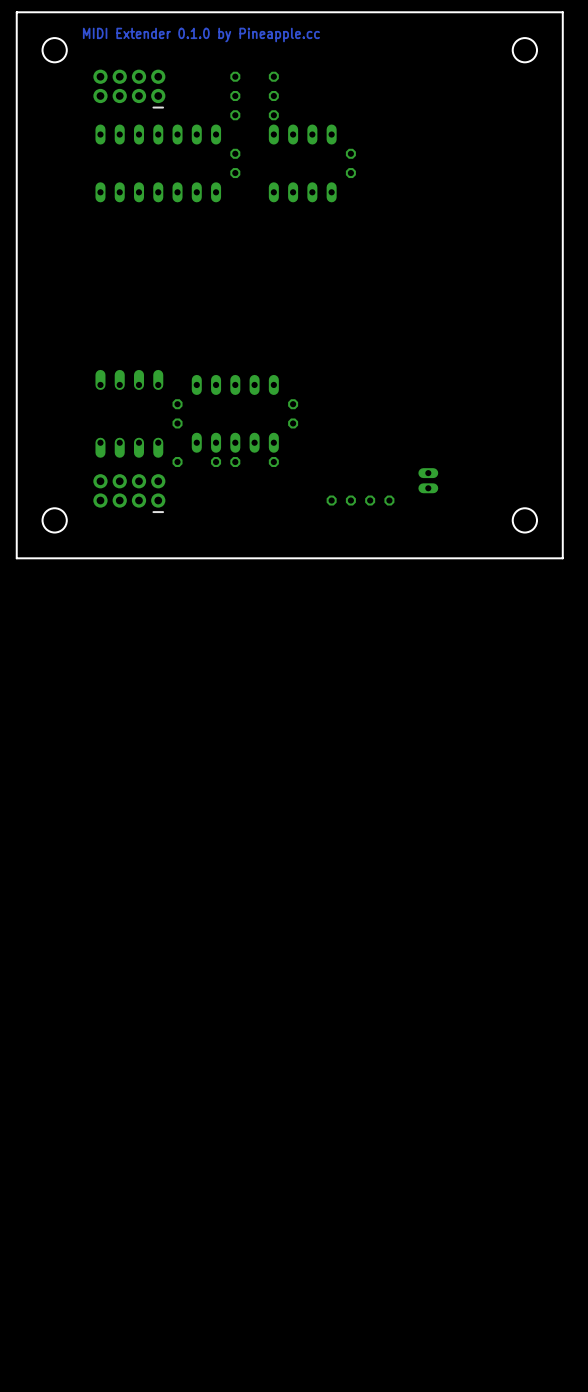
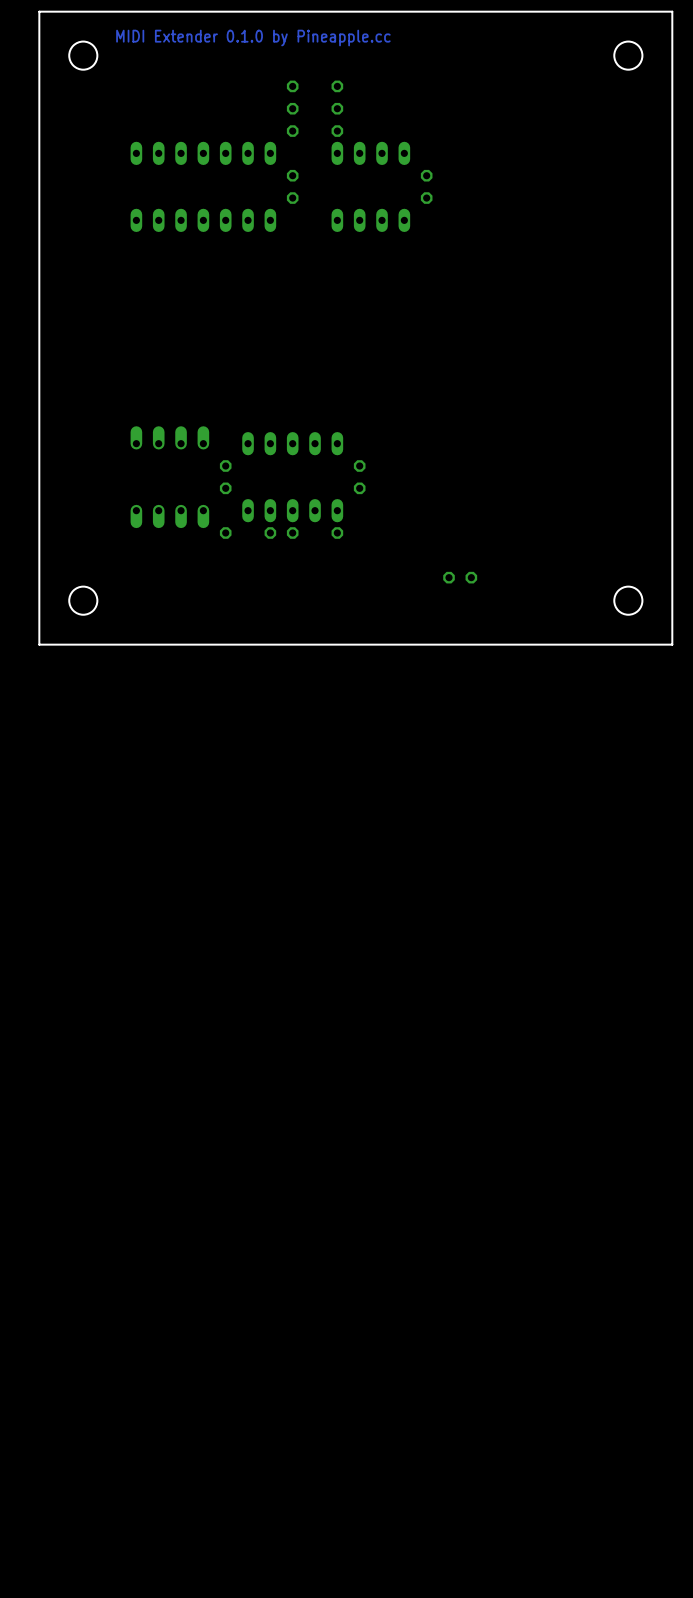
part: (129, 88) -> none
part: (428, 480) -> none
part: (129, 493) -> none
part: (341, 500) -> none

